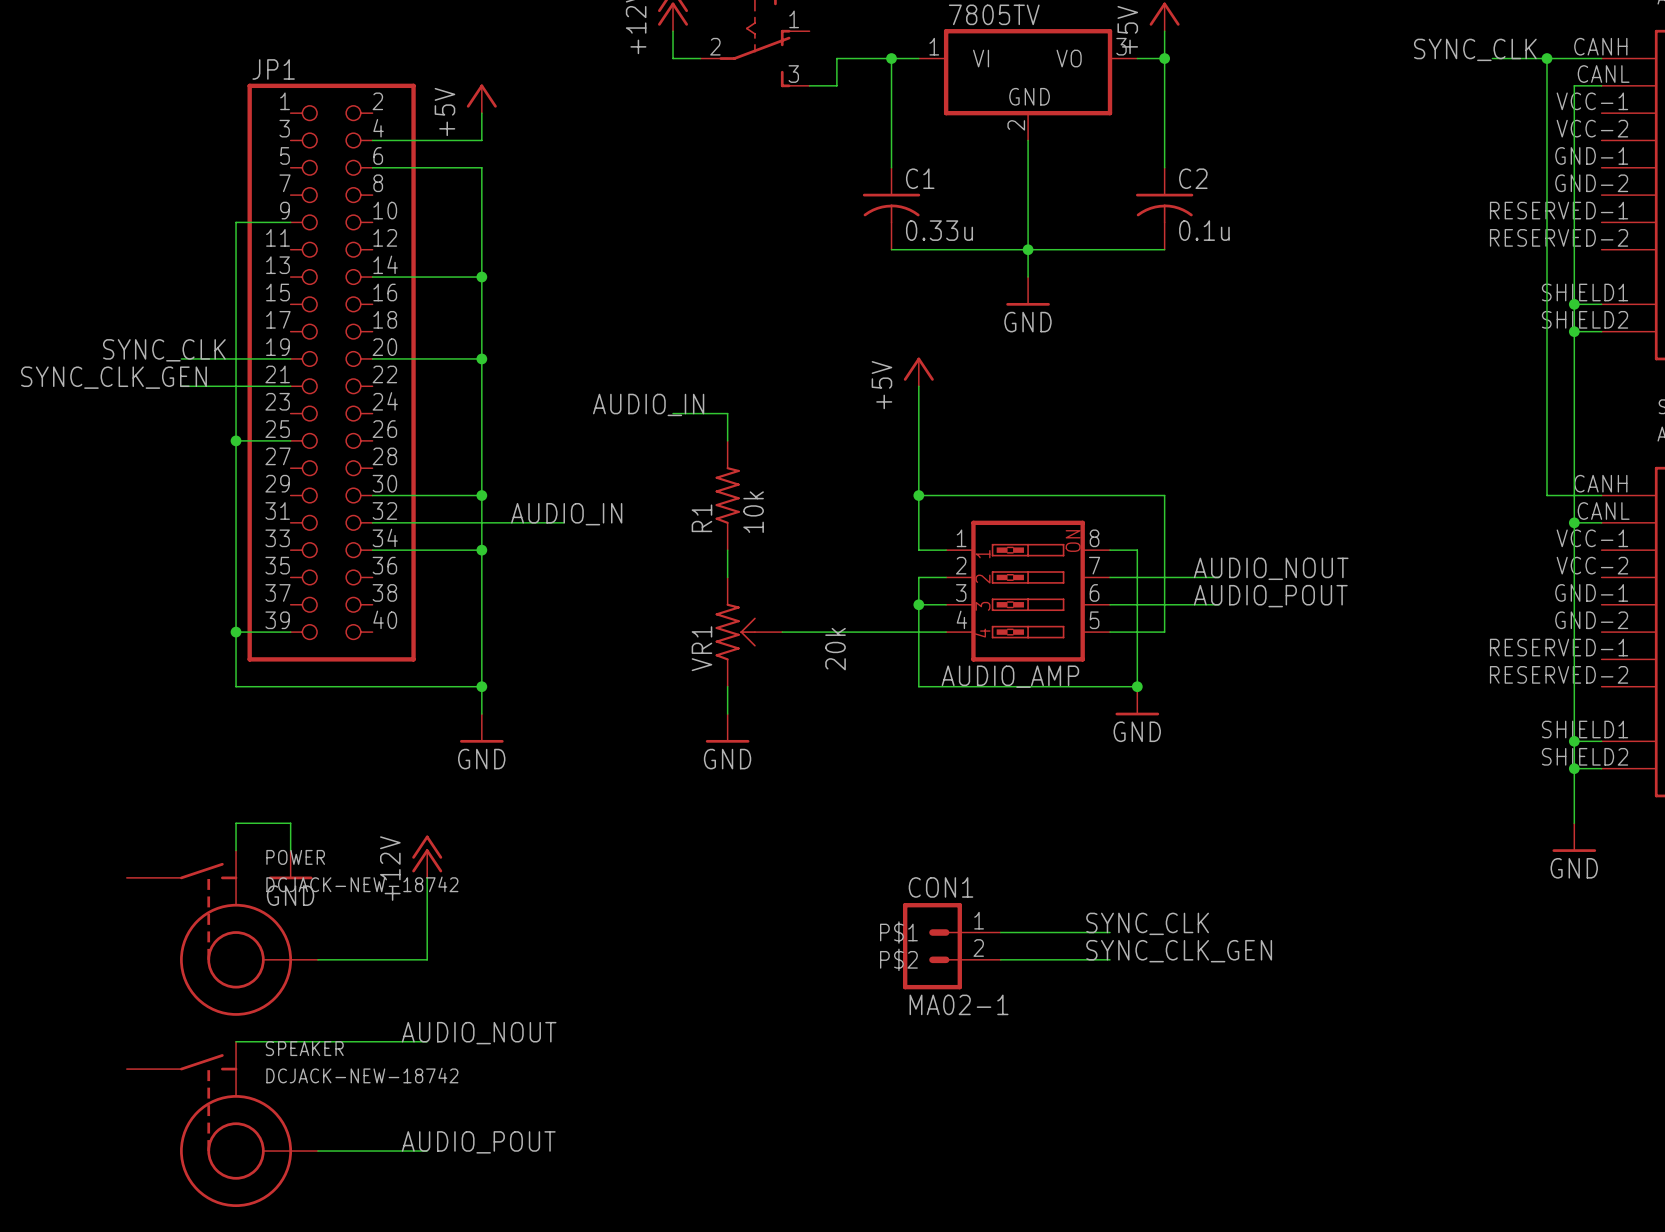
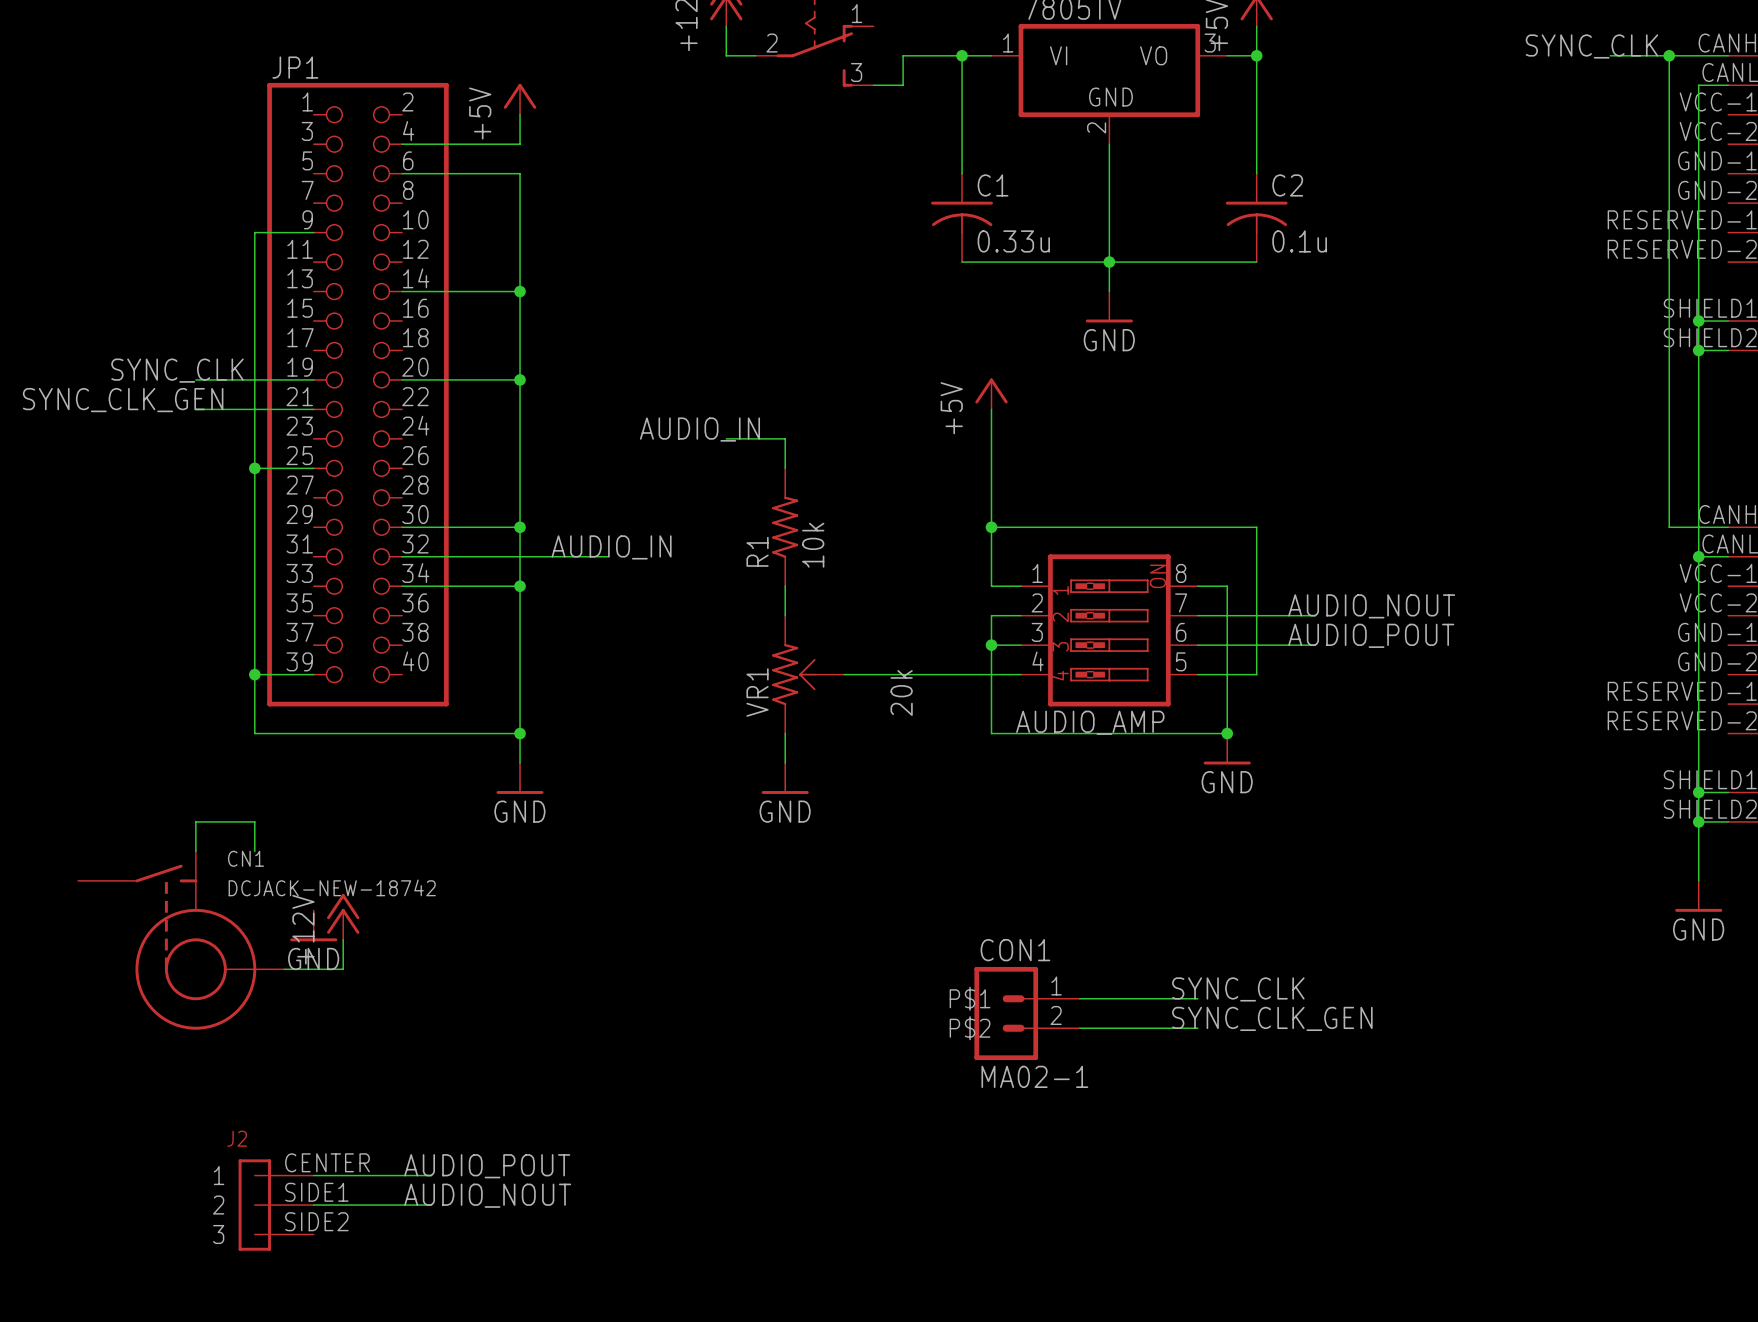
wire: (236, 850) (236, 823) (290, 823) (290, 850) -> (195, 851) (195, 821) (254, 821) (254, 851)
power symbol position: +12V (427, 856) -> +12V (343, 916)
wire: none -> (343, 939) (343, 969) (284, 969)
wire: (427, 877) (427, 959) (317, 959) -> none
CN1: none -> DCJACK-NEW-18742 (181, 940)
POWER: DCJACK-NEW-18742 (222, 933) -> none
label position: AUDIO_NOUT (479, 1033) -> AUDIO_NOUT (487, 1195)
wire: (236, 1041) (427, 1041) -> none
wire: none -> (313, 1175) (431, 1175)
J2: none -> (276, 1205)
SPEAKER: DCJACK-NEW-18742 (222, 1124) -> none
label position: AUDIO_POUT (478, 1142) -> AUDIO_POUT (487, 1166)
wire: (317, 1151) (427, 1151) -> (313, 1205) (431, 1205)

